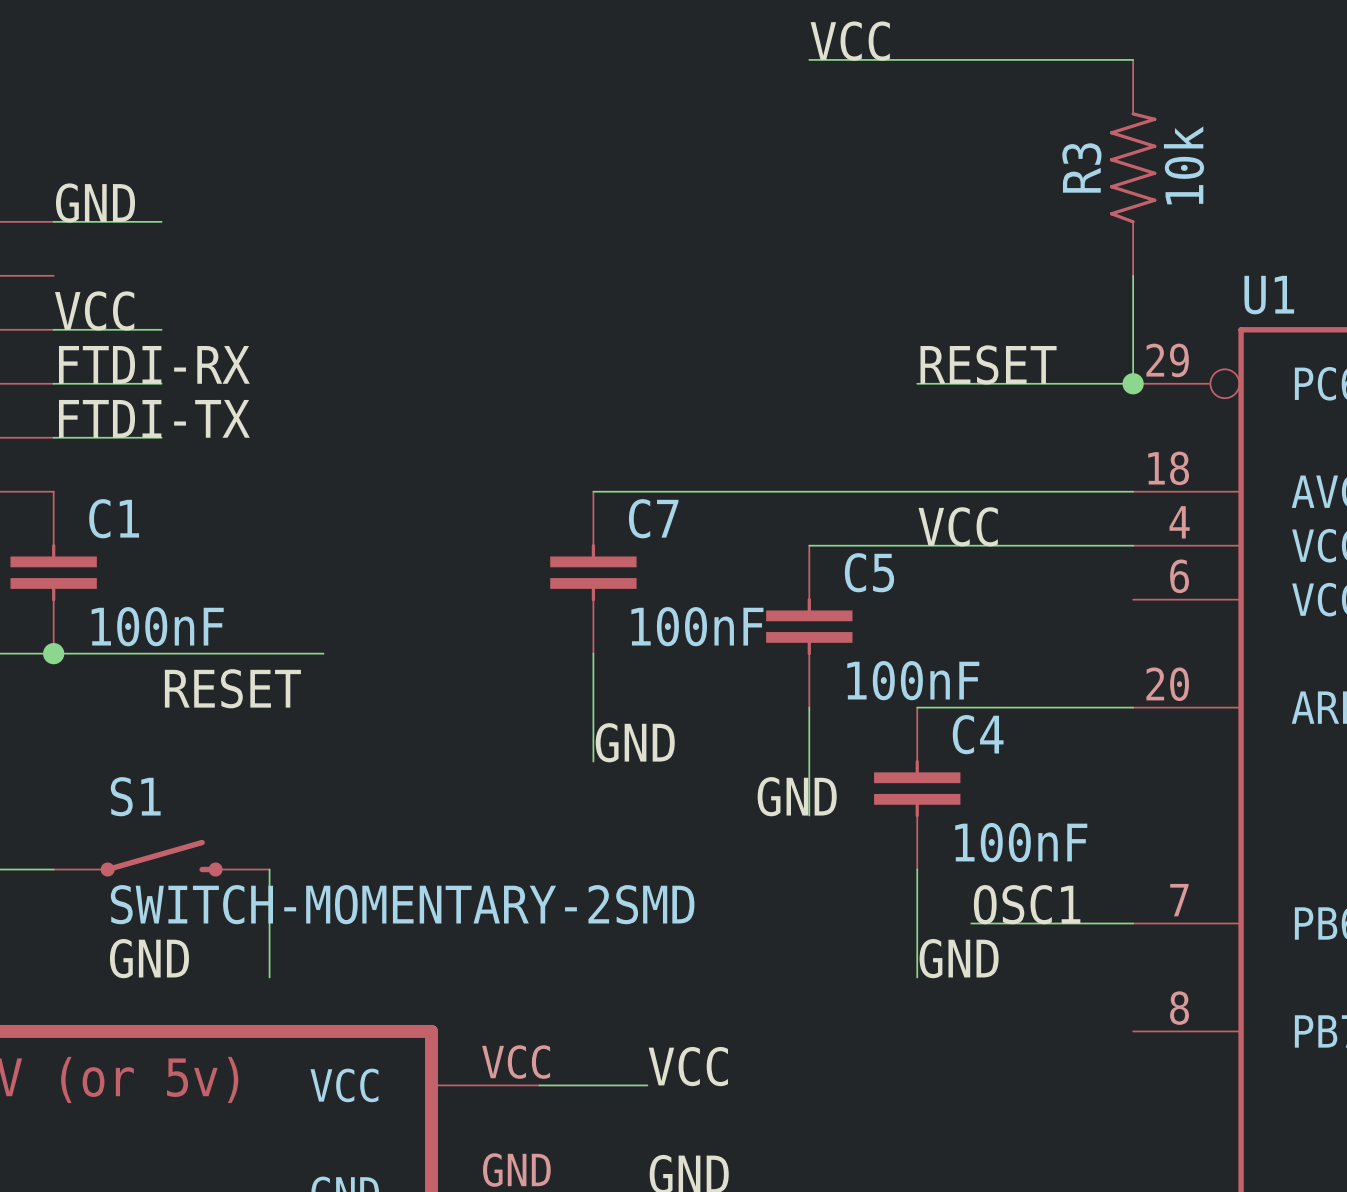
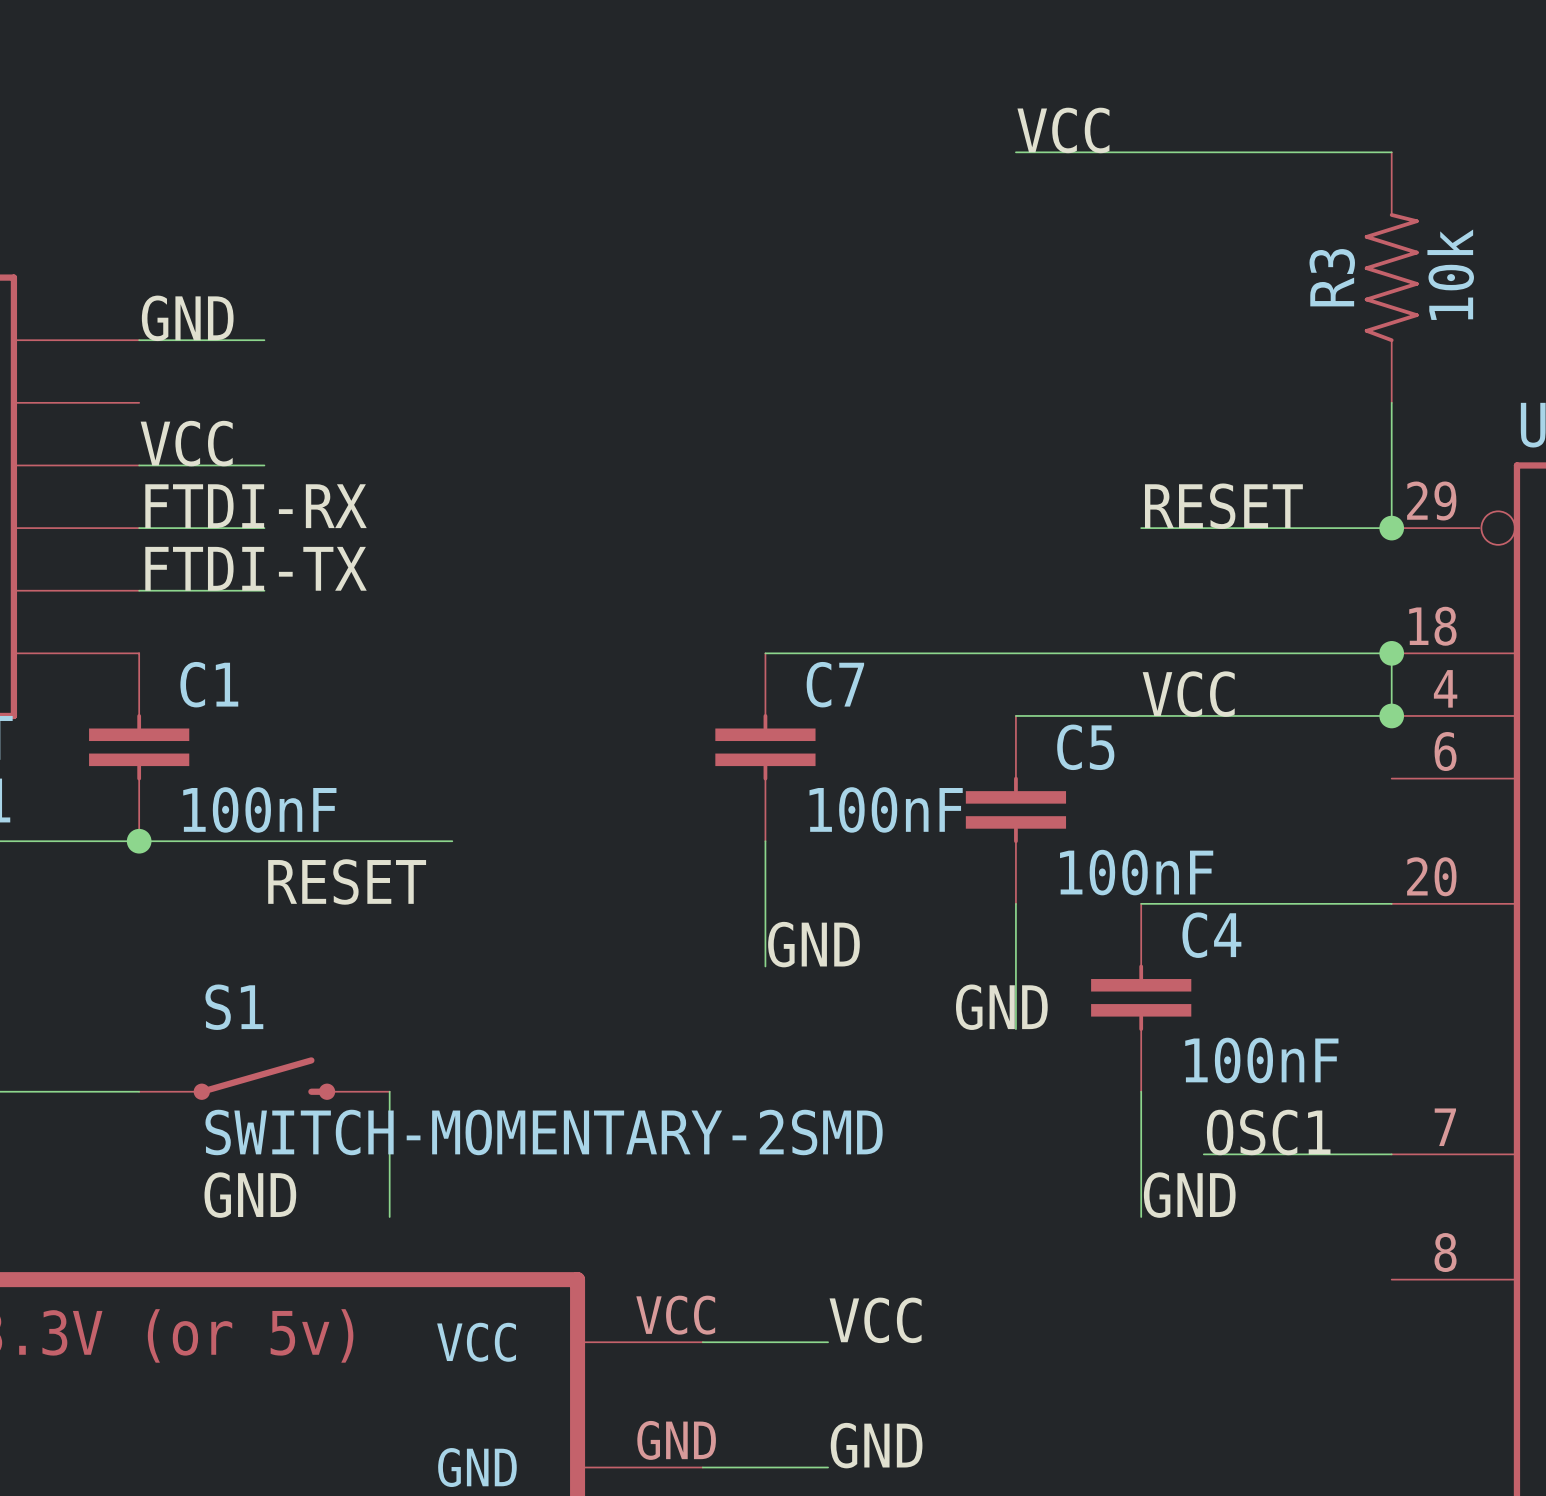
wire: none -> (1391, 653) (1391, 715)
junction: none -> (1391, 653)
junction: none -> (1391, 715)

